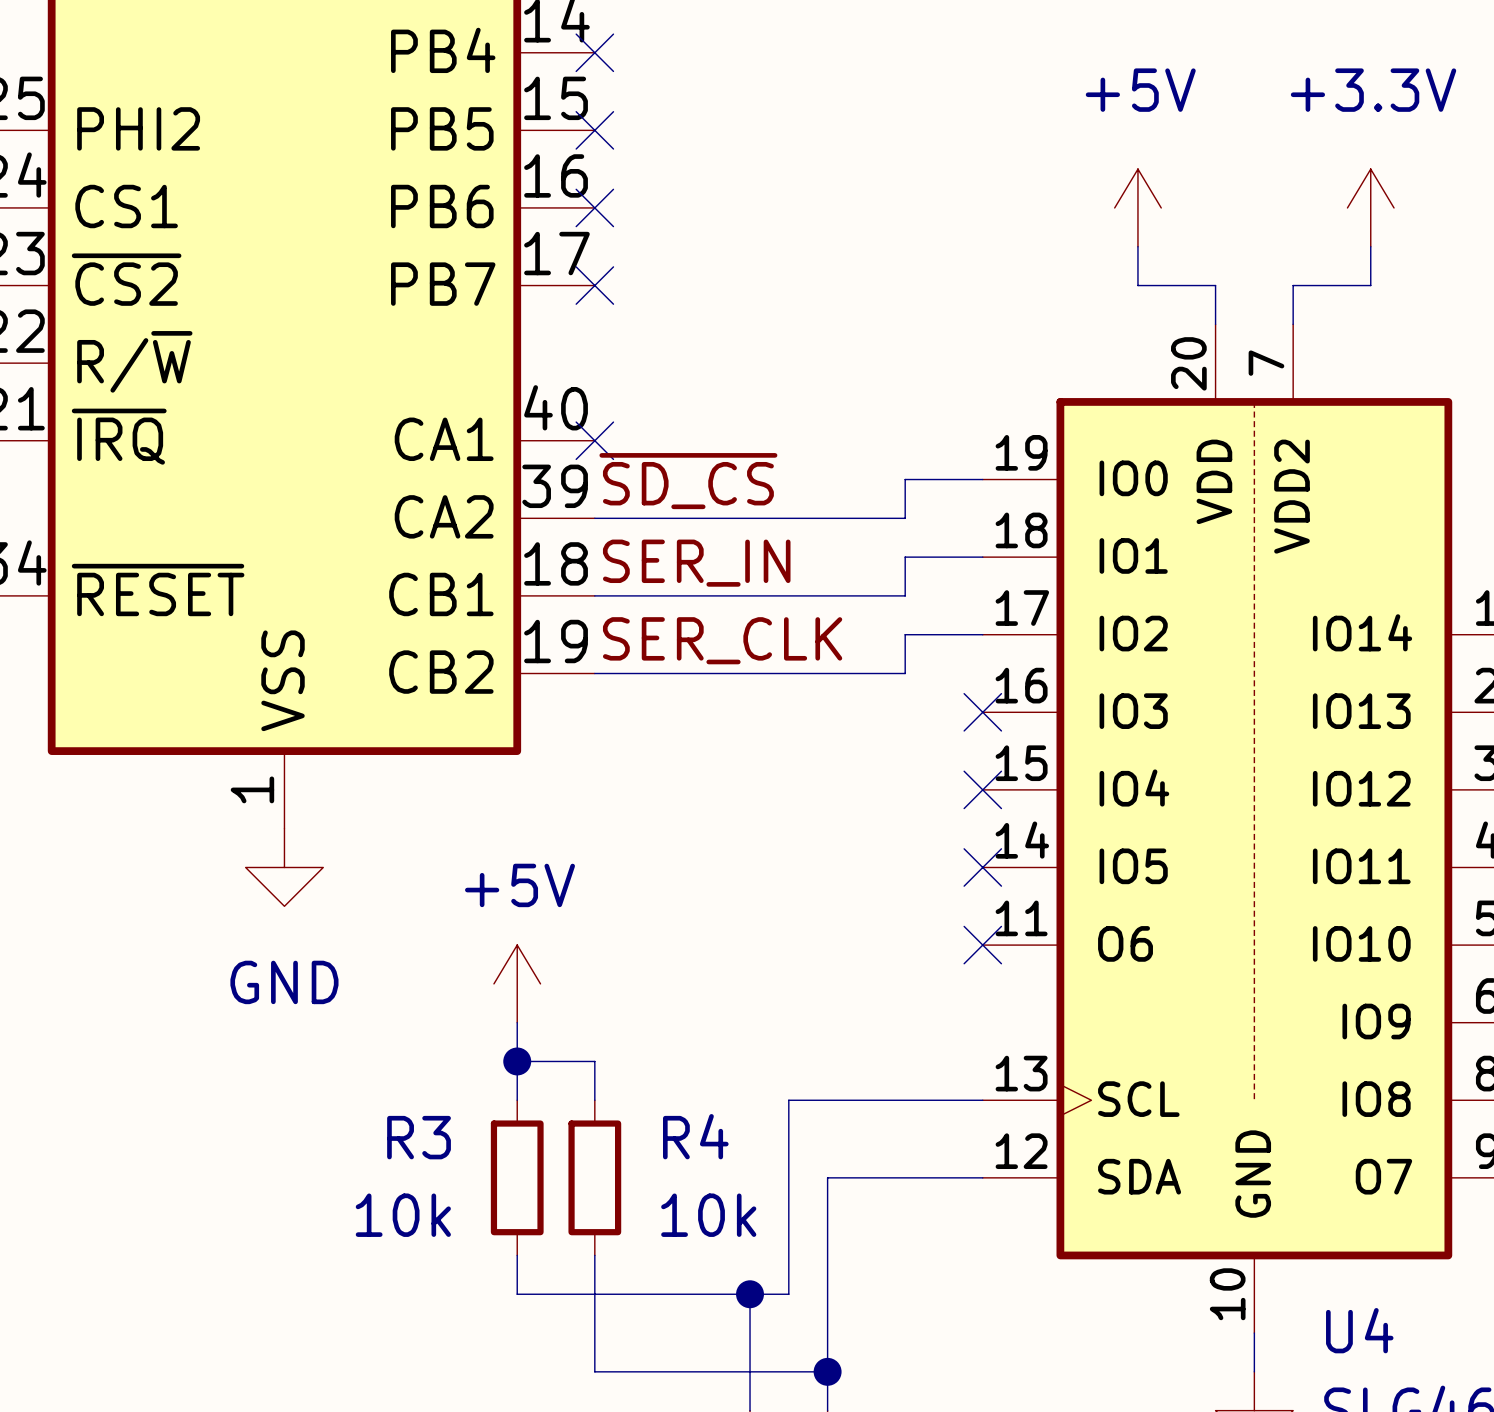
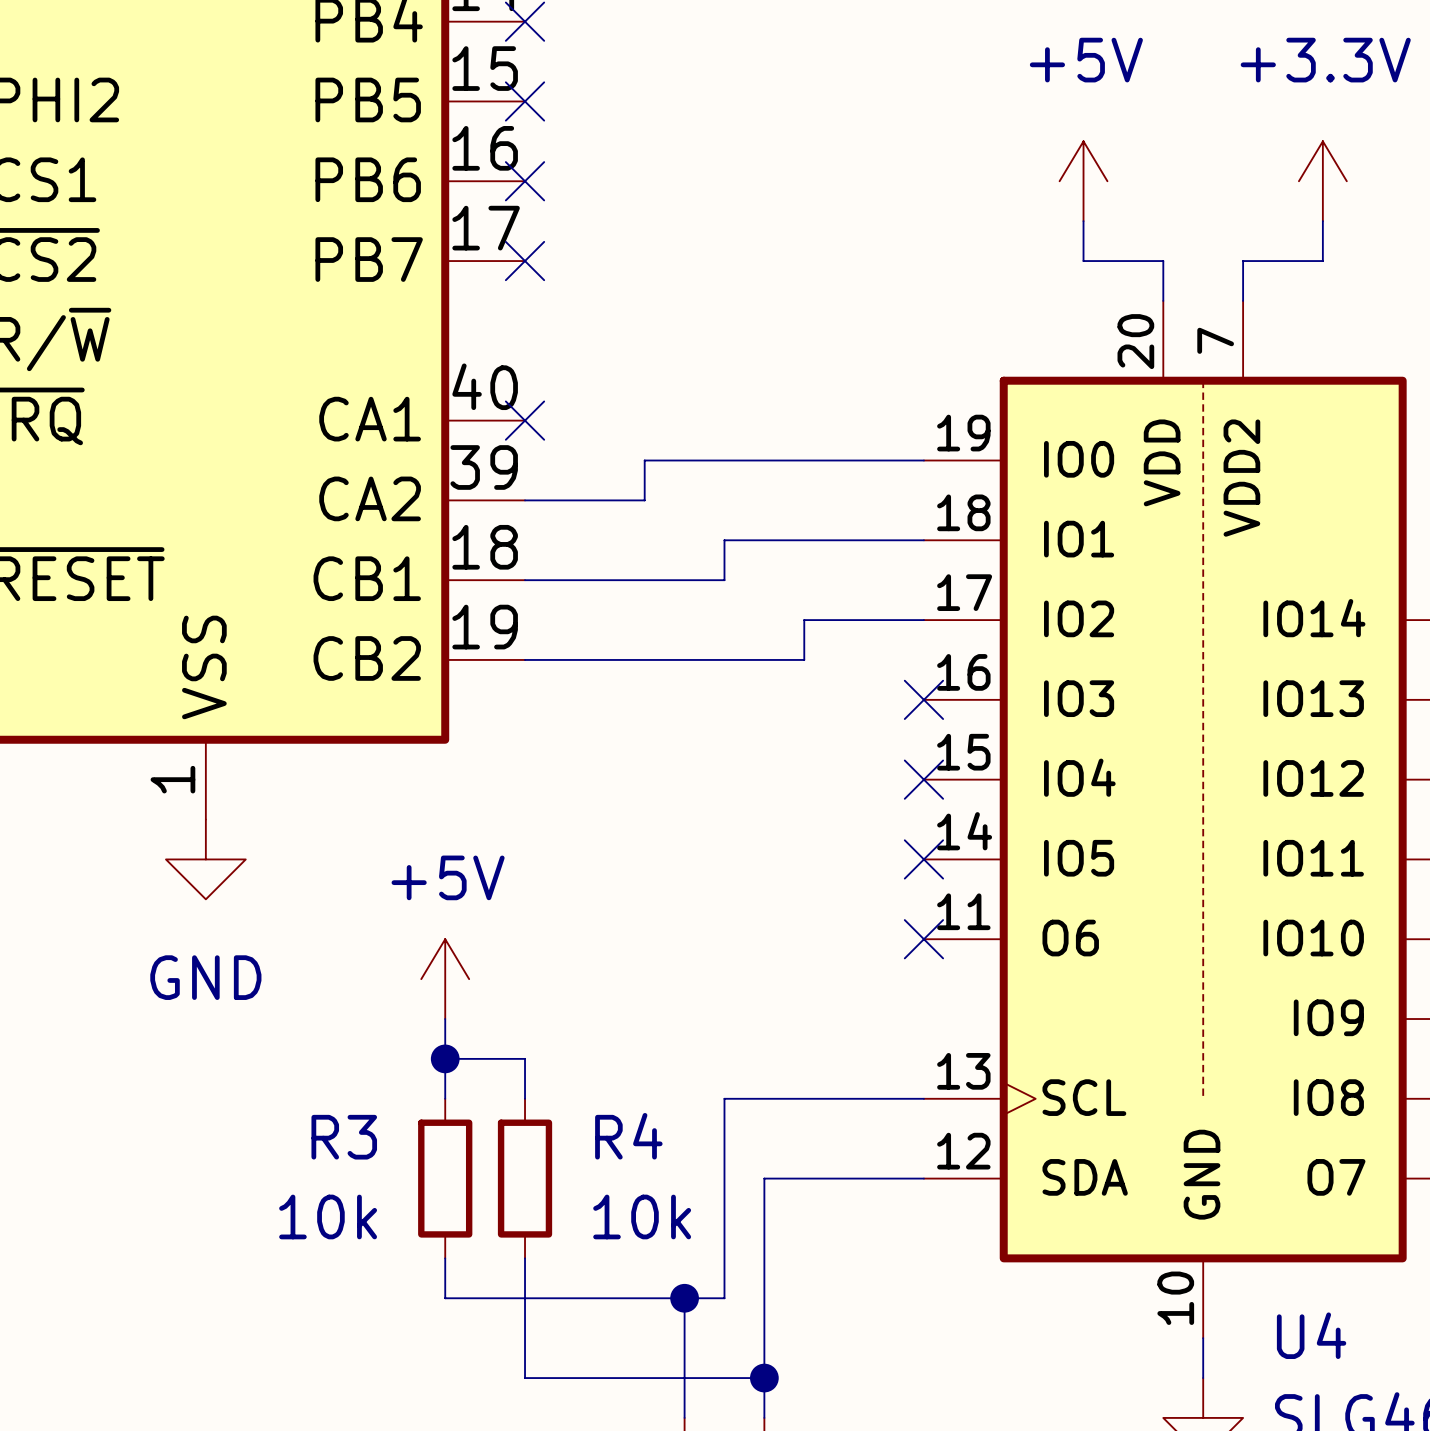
wire: (905, 479) (905, 518) (711, 518) -> (844, 460) (644, 460) (644, 500)
label: ~{SD_CS} (688, 481) -> none
wire: (905, 557) (905, 595) (788, 595) -> (844, 540) (724, 540) (724, 580)
label: SER_IN (696, 563) -> none
wire: (905, 634) (905, 673) (866, 673) -> (844, 620) (804, 620) (804, 659)
label: SER_CLK (722, 640) -> none

